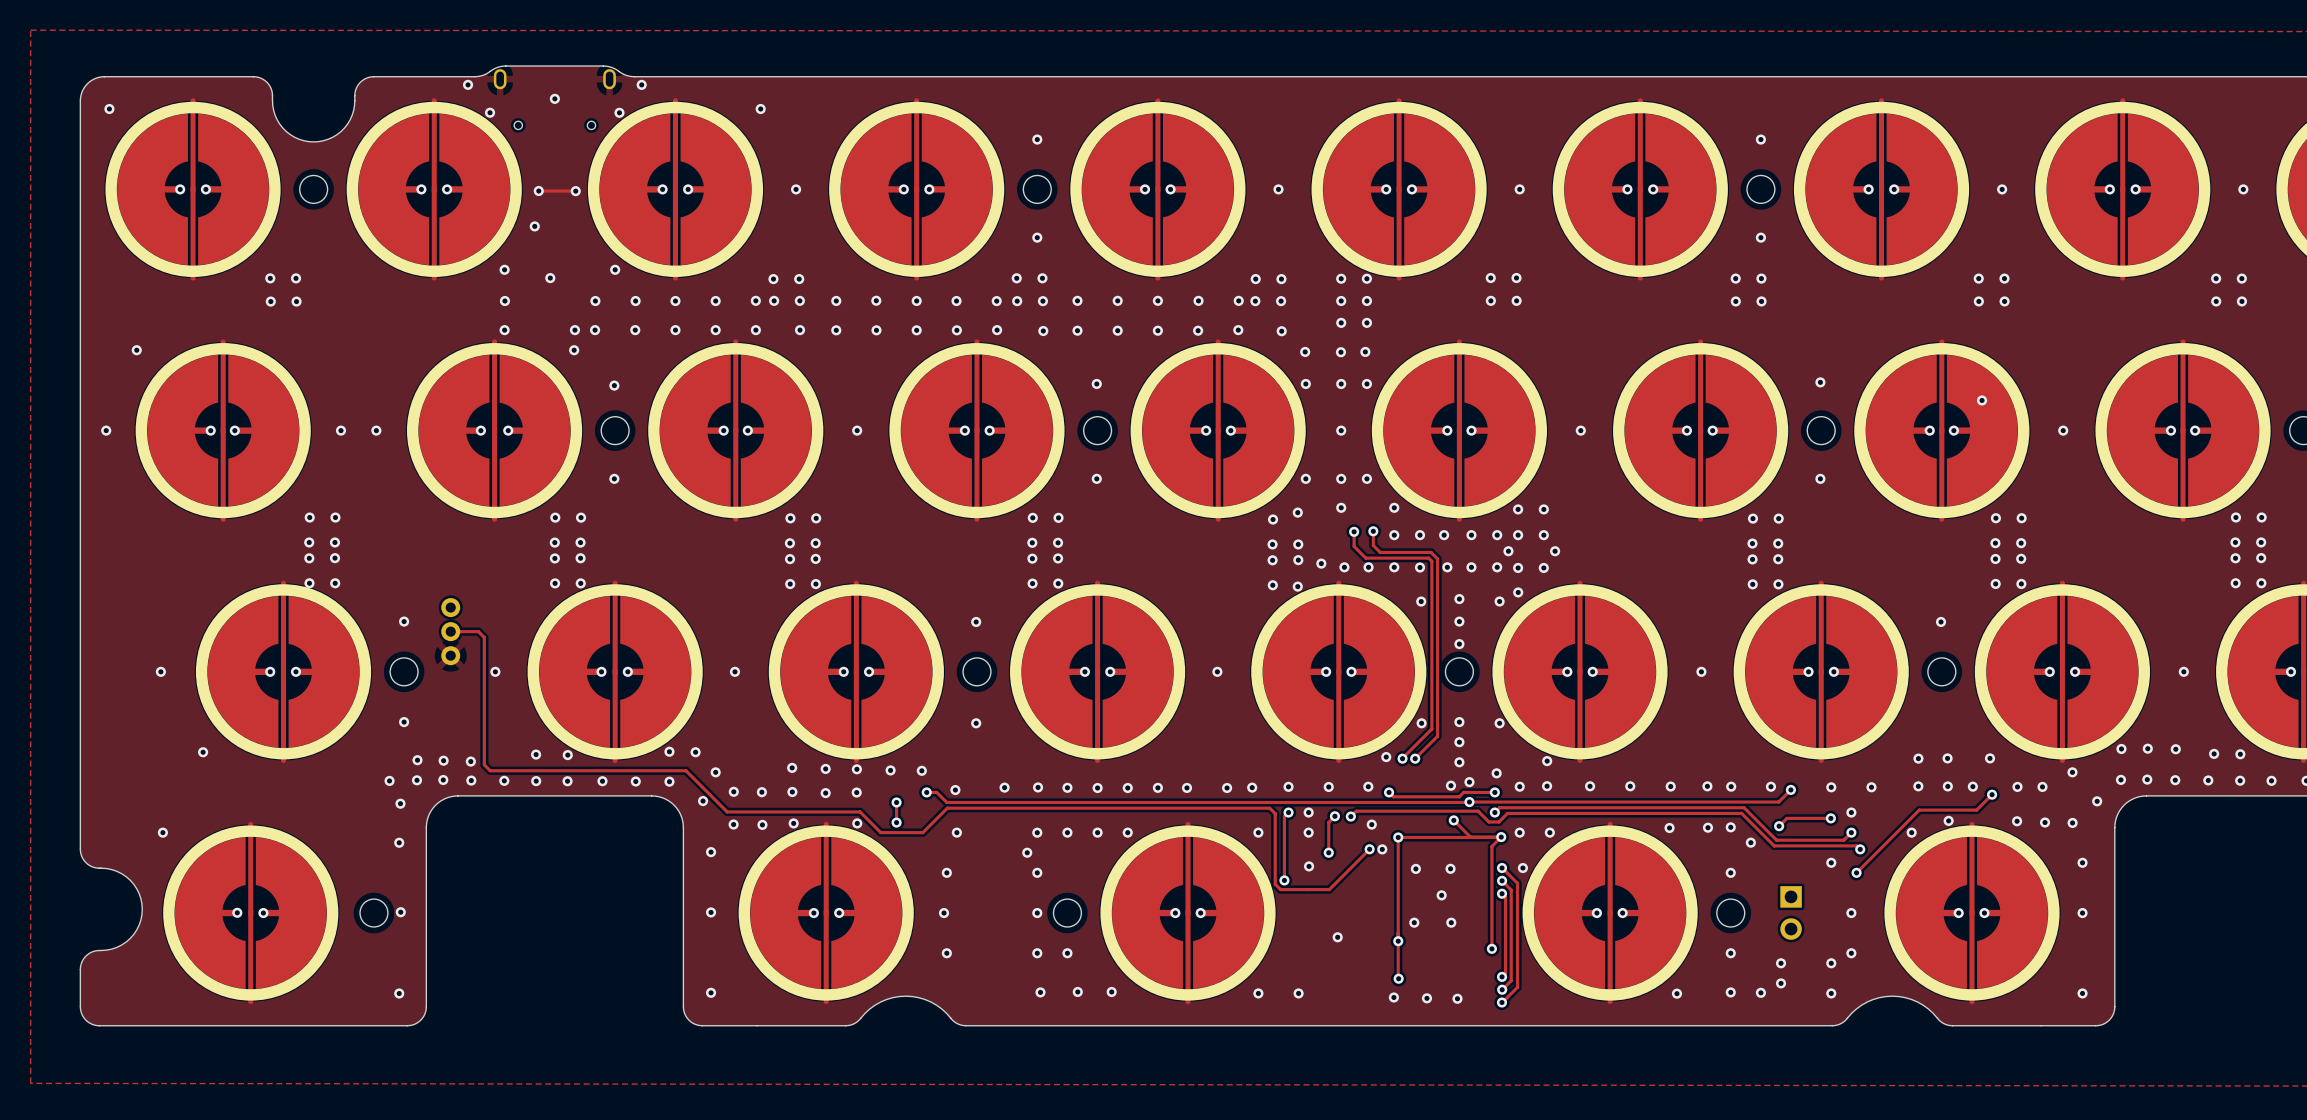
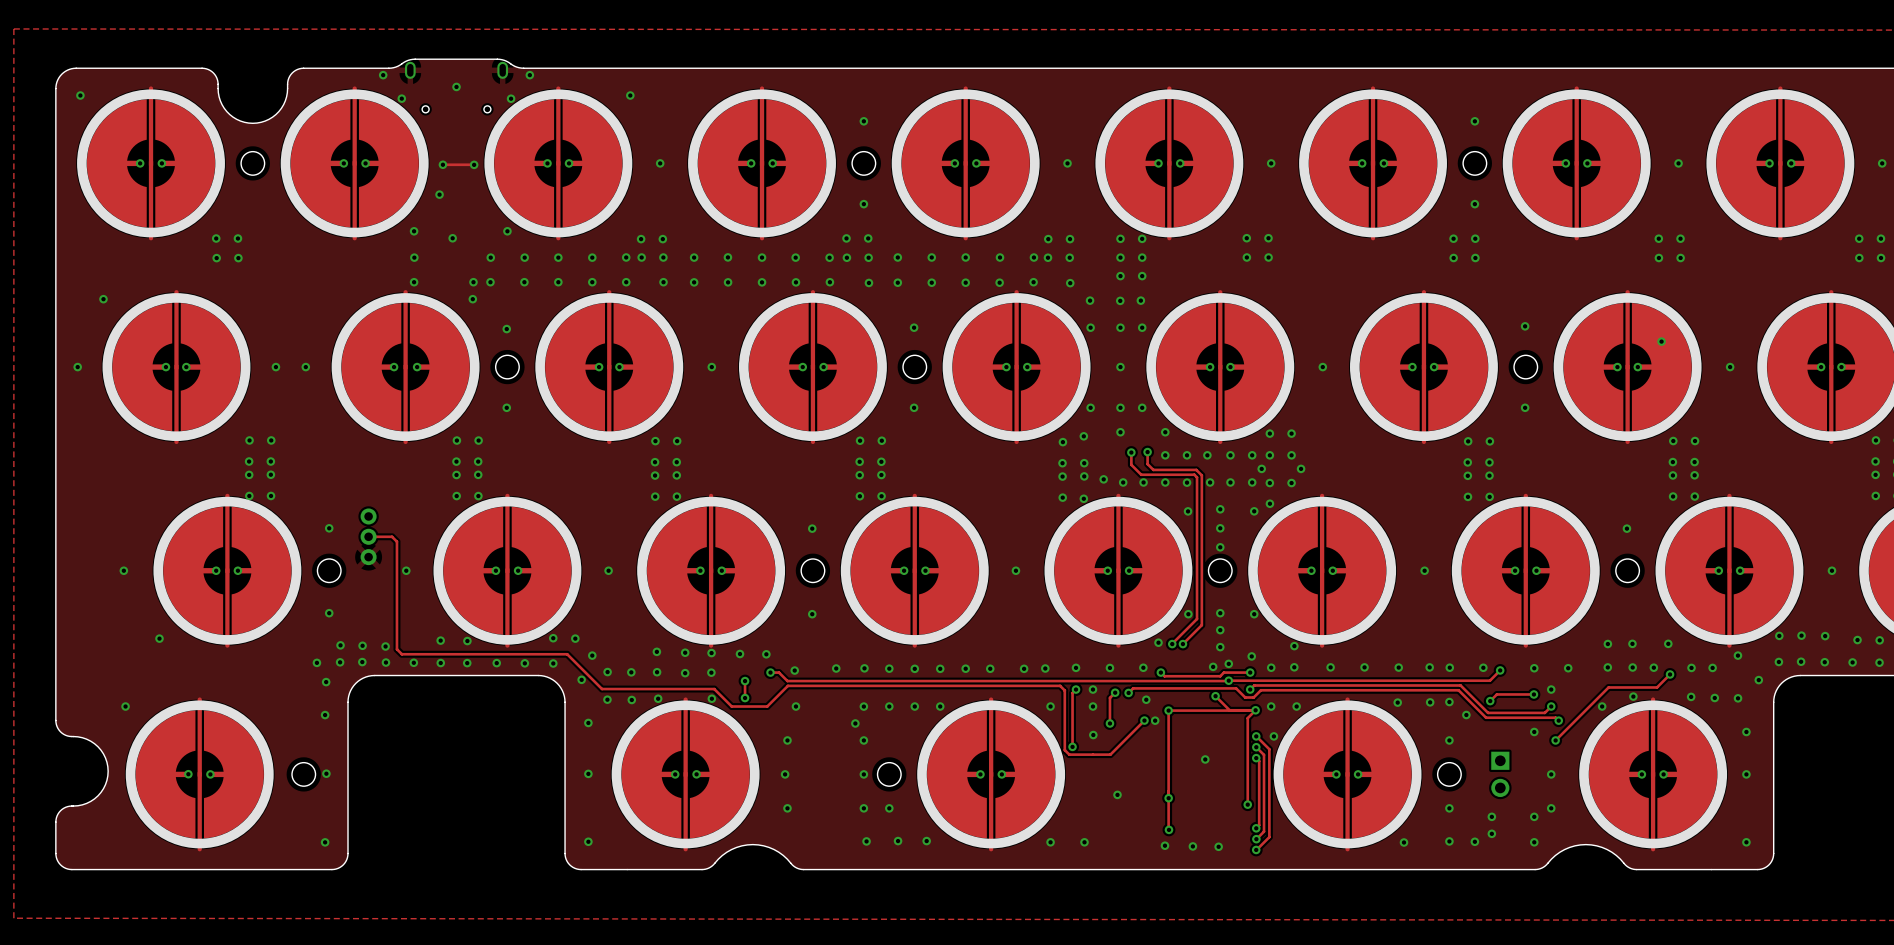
via: (1415, 868) -> none
via: (1450, 868) -> none
via: (1414, 922) -> none
via: (1451, 922) -> none

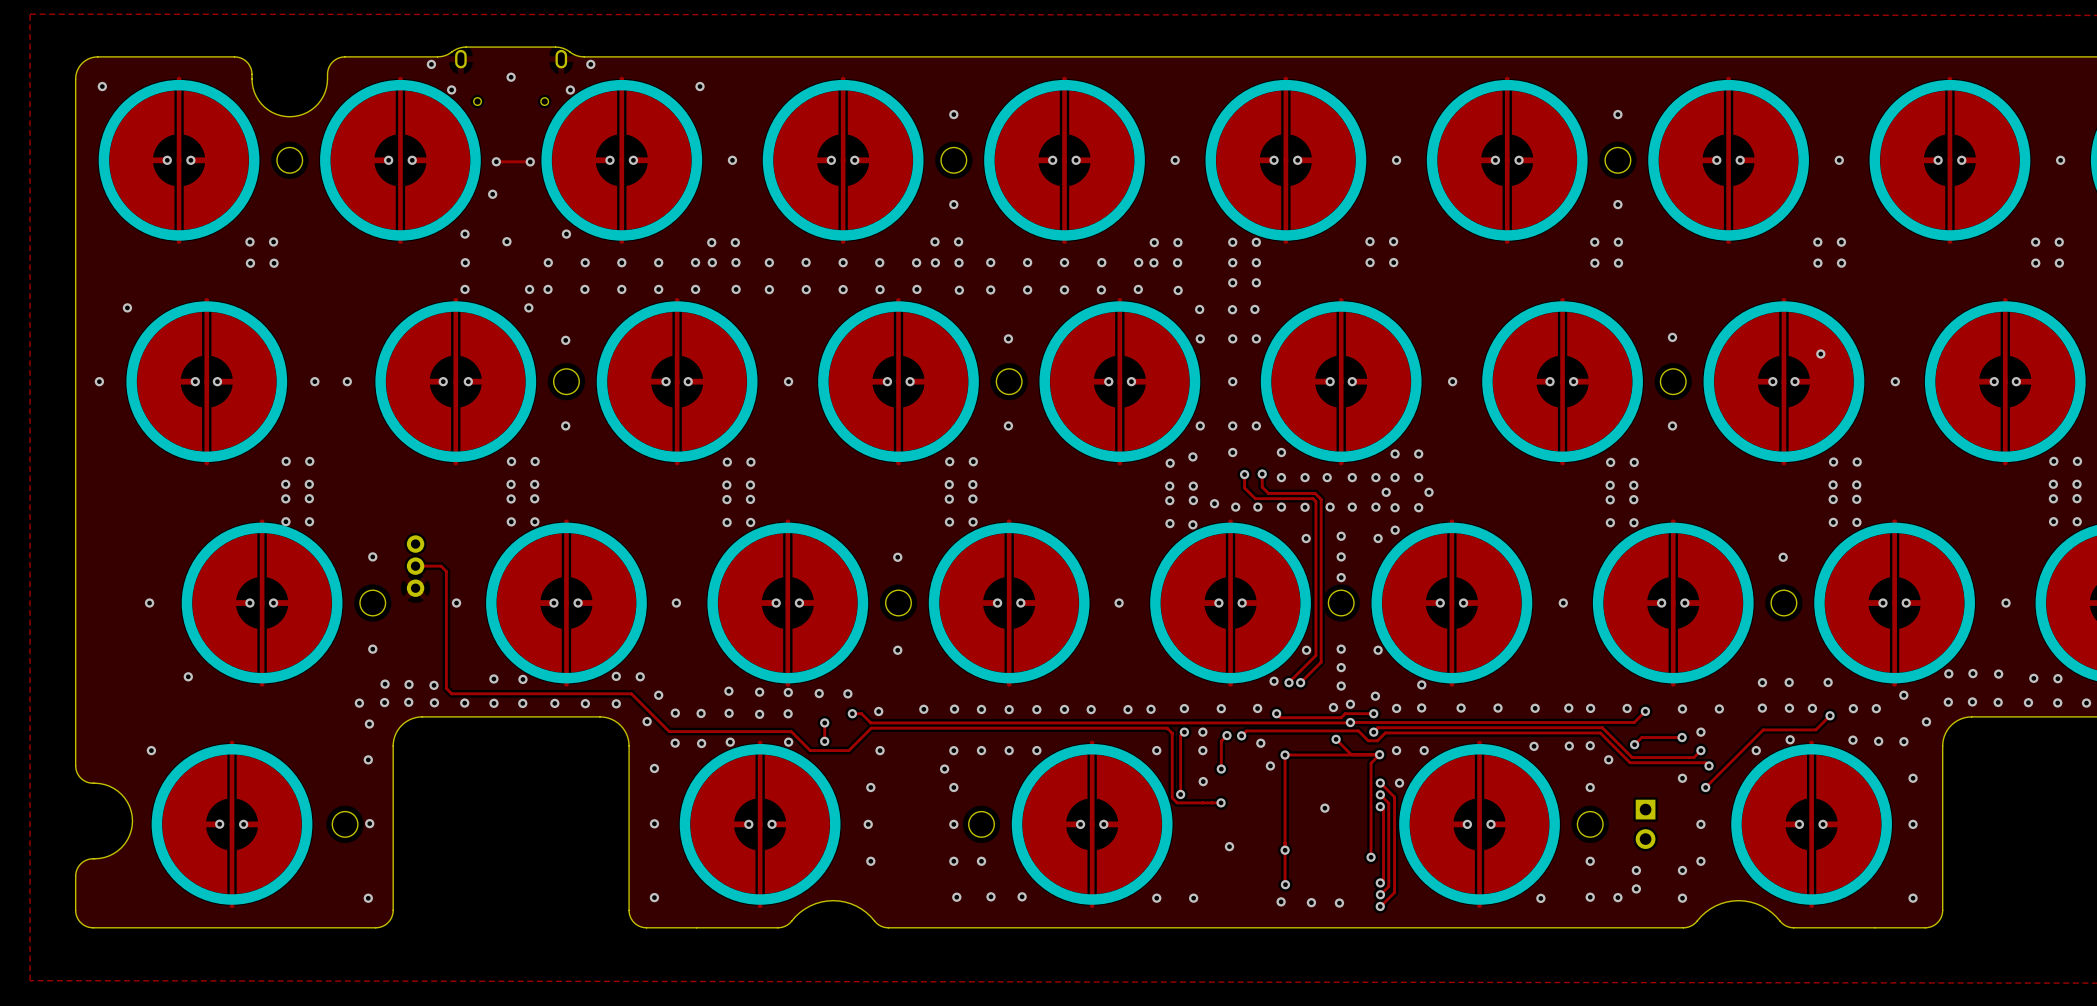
track: (1144, 720) (1109, 754) -> none
via position: (1144, 720) -> (1221, 802)

